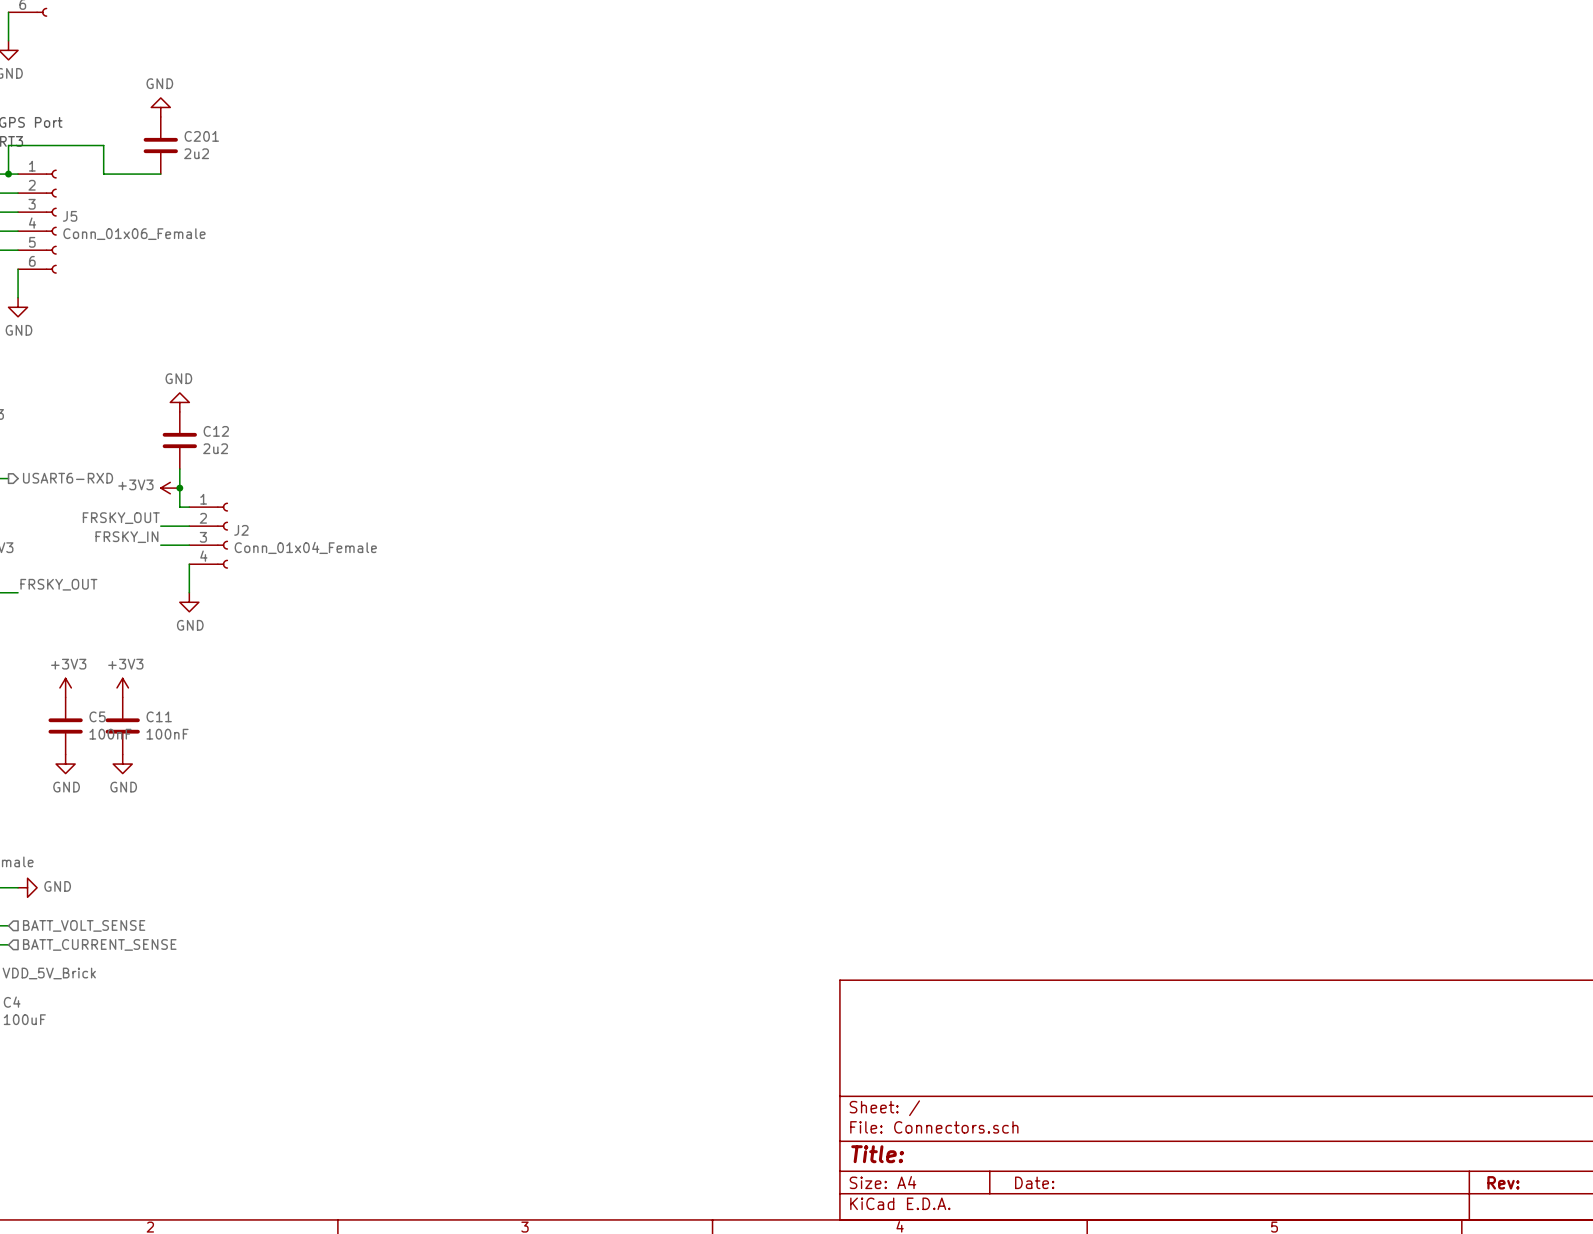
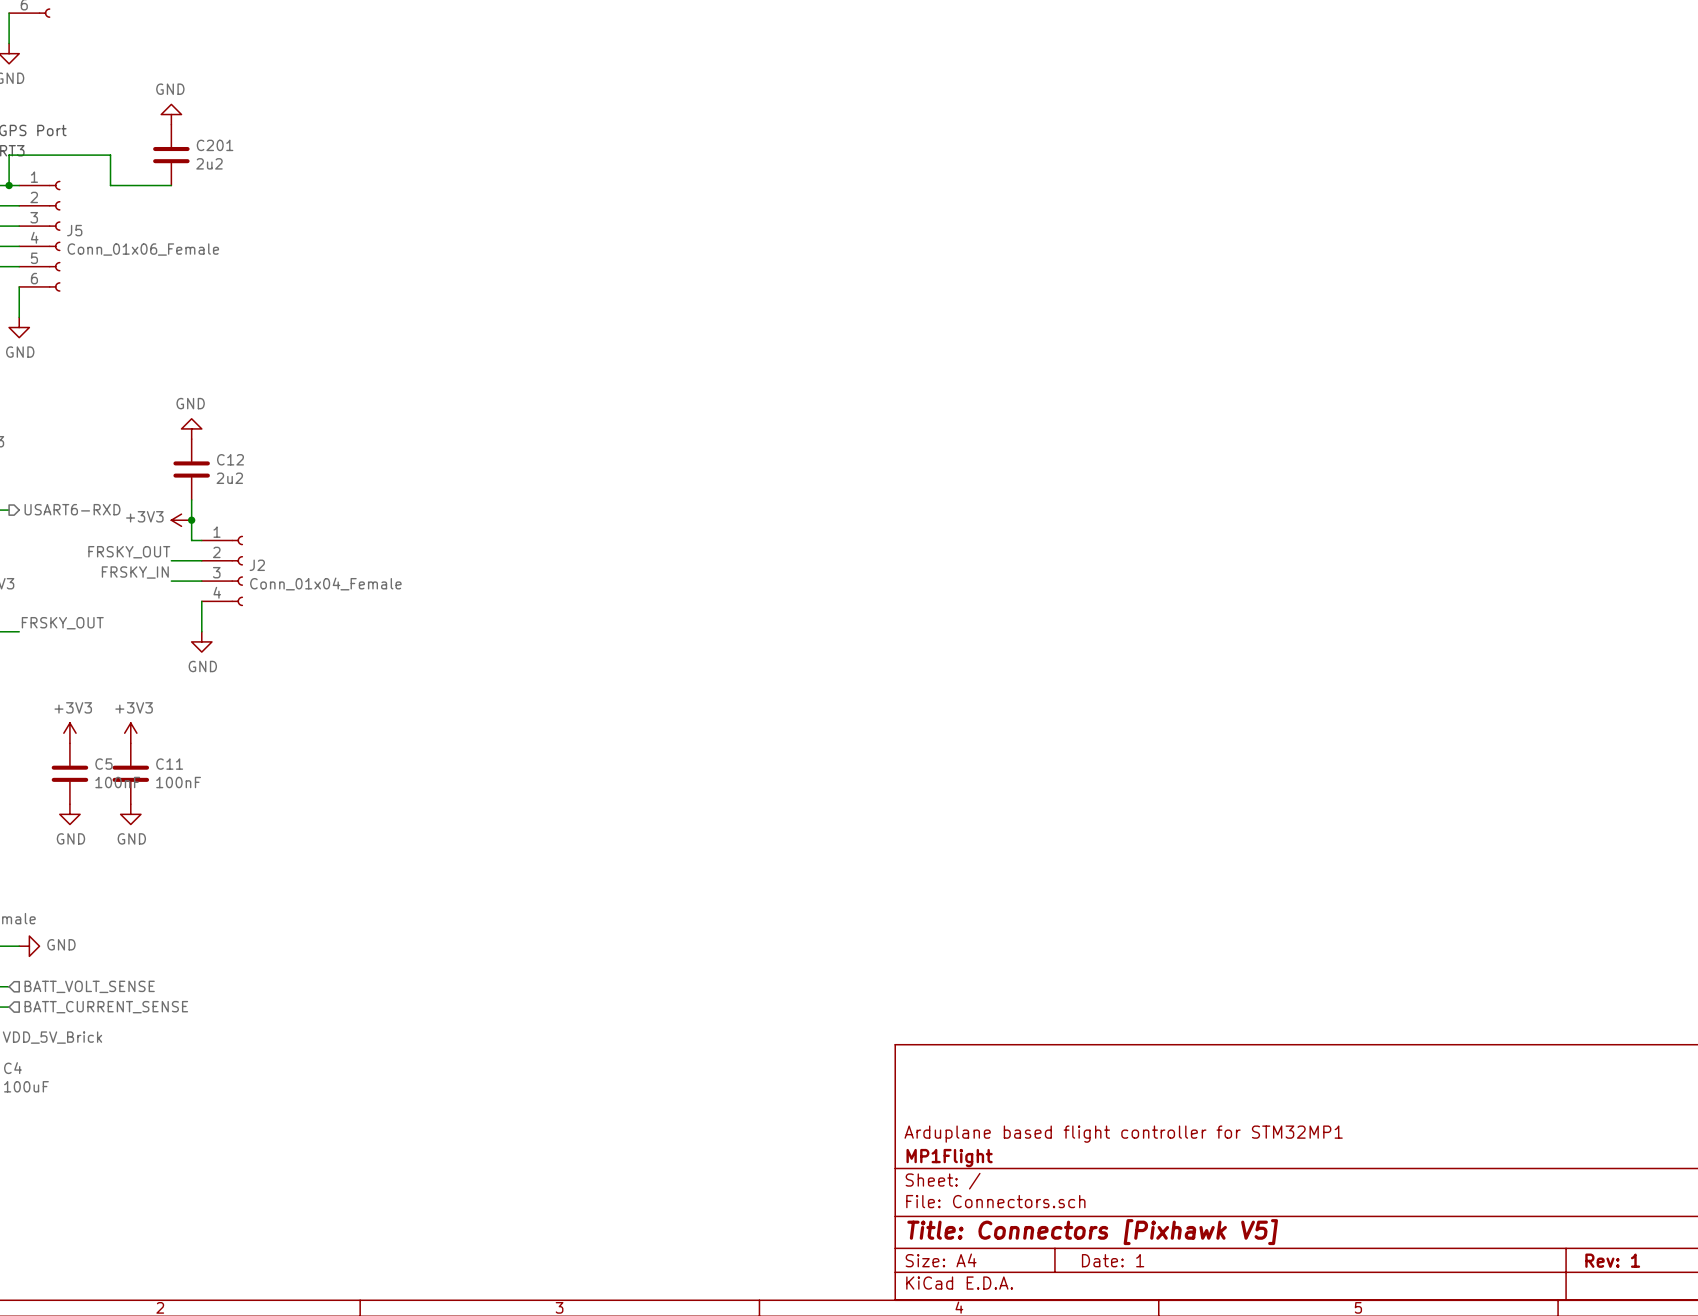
title block: none -> Arduplane based flight controller for STM32MP1 (1123, 1134)
title block: none -> MP1Flight (949, 1158)
title block: Title: (877, 1154) -> Title: Connectors [Pixhawk V5] (1092, 1232)
title block: Date: (1034, 1182) -> Date: 1 (1113, 1260)
title block: Rev: (1503, 1182) -> Rev: 1 (1612, 1260)

